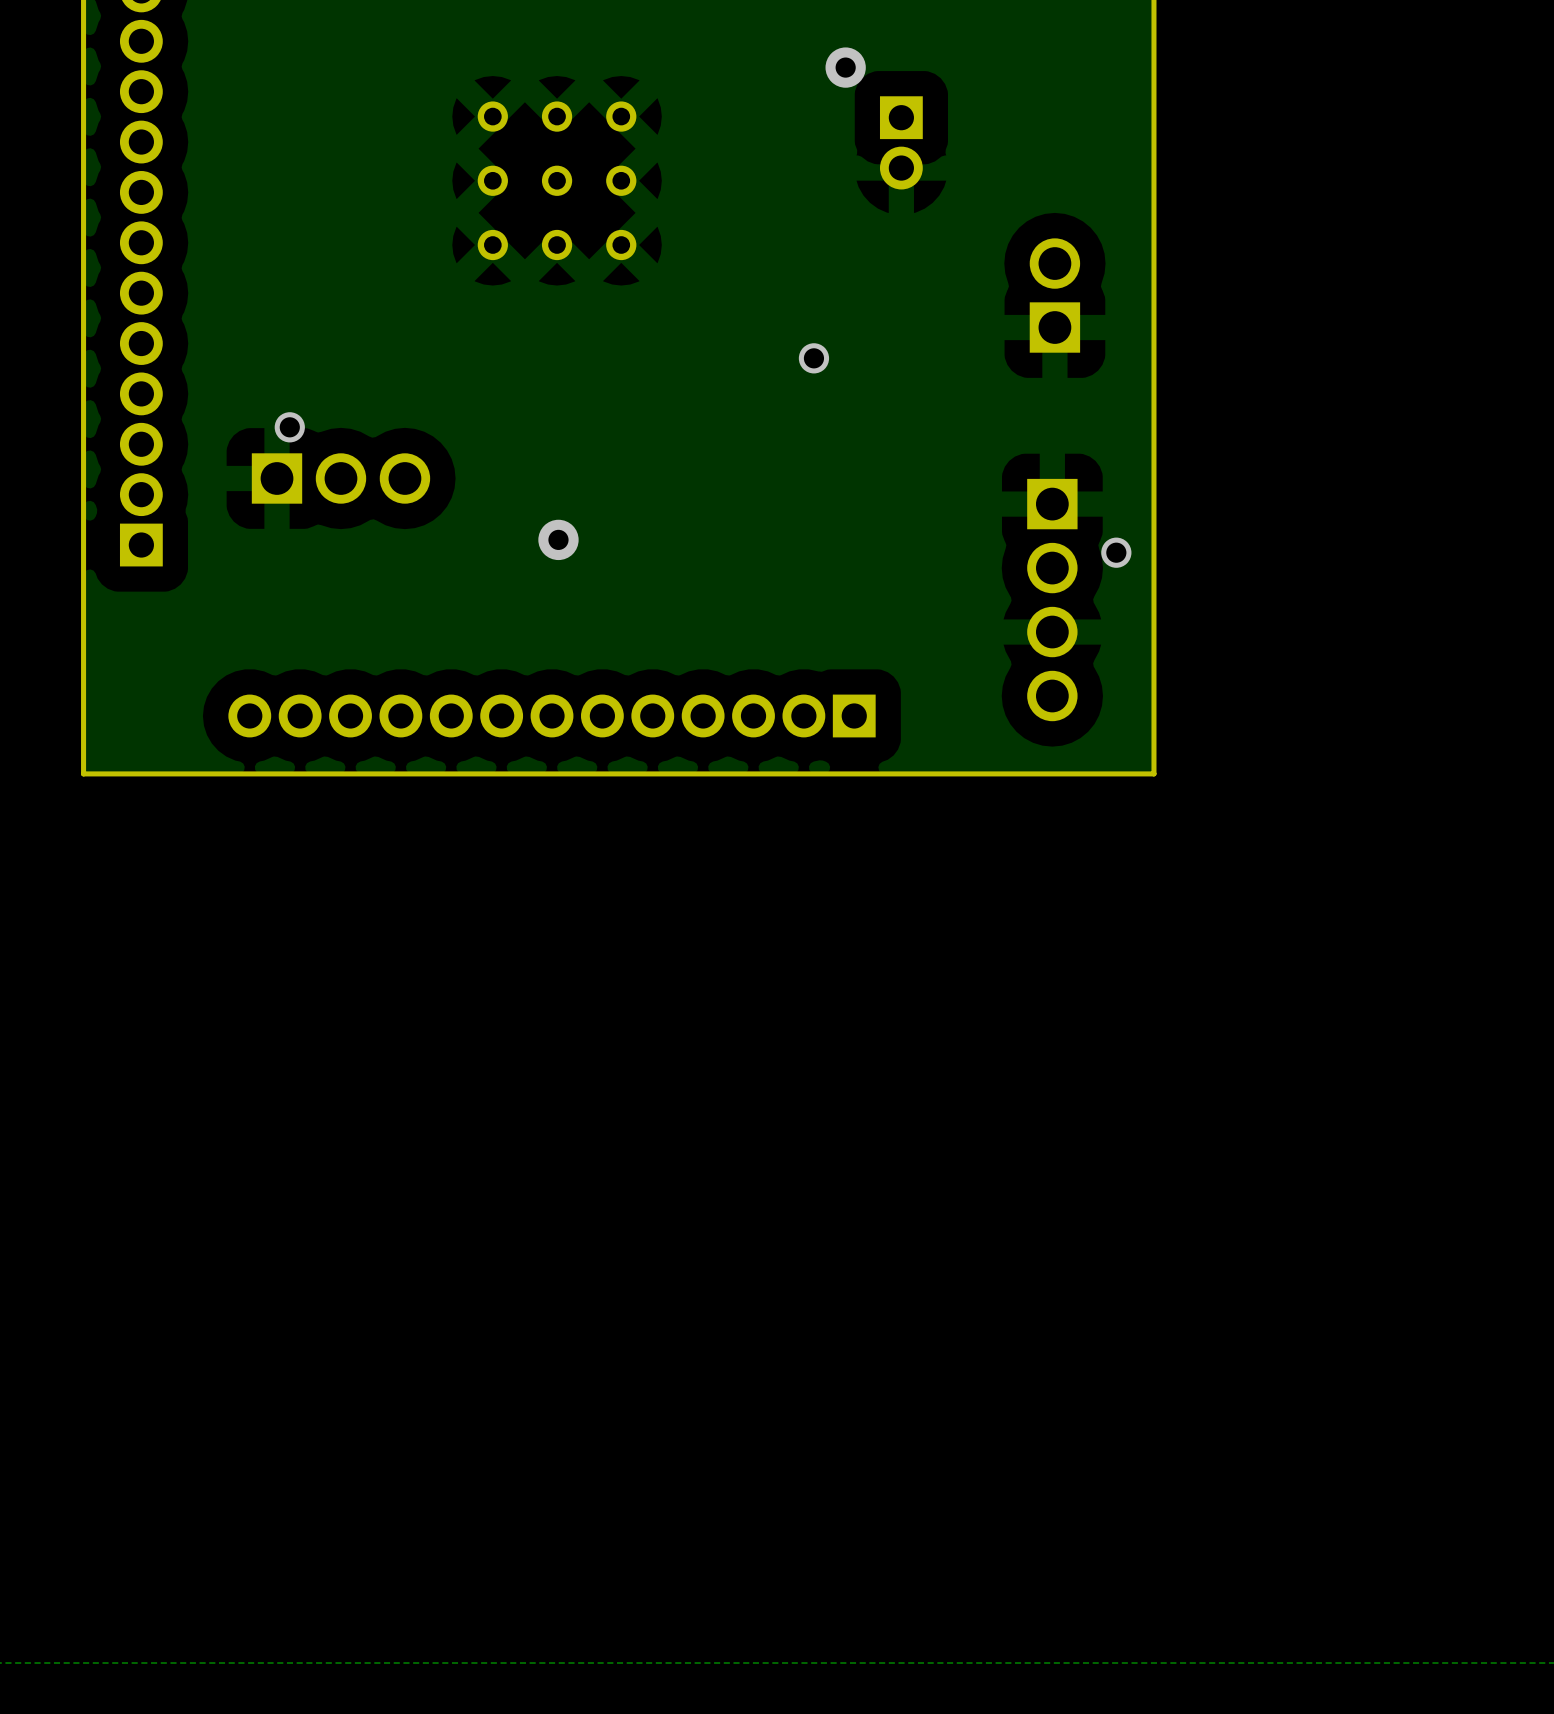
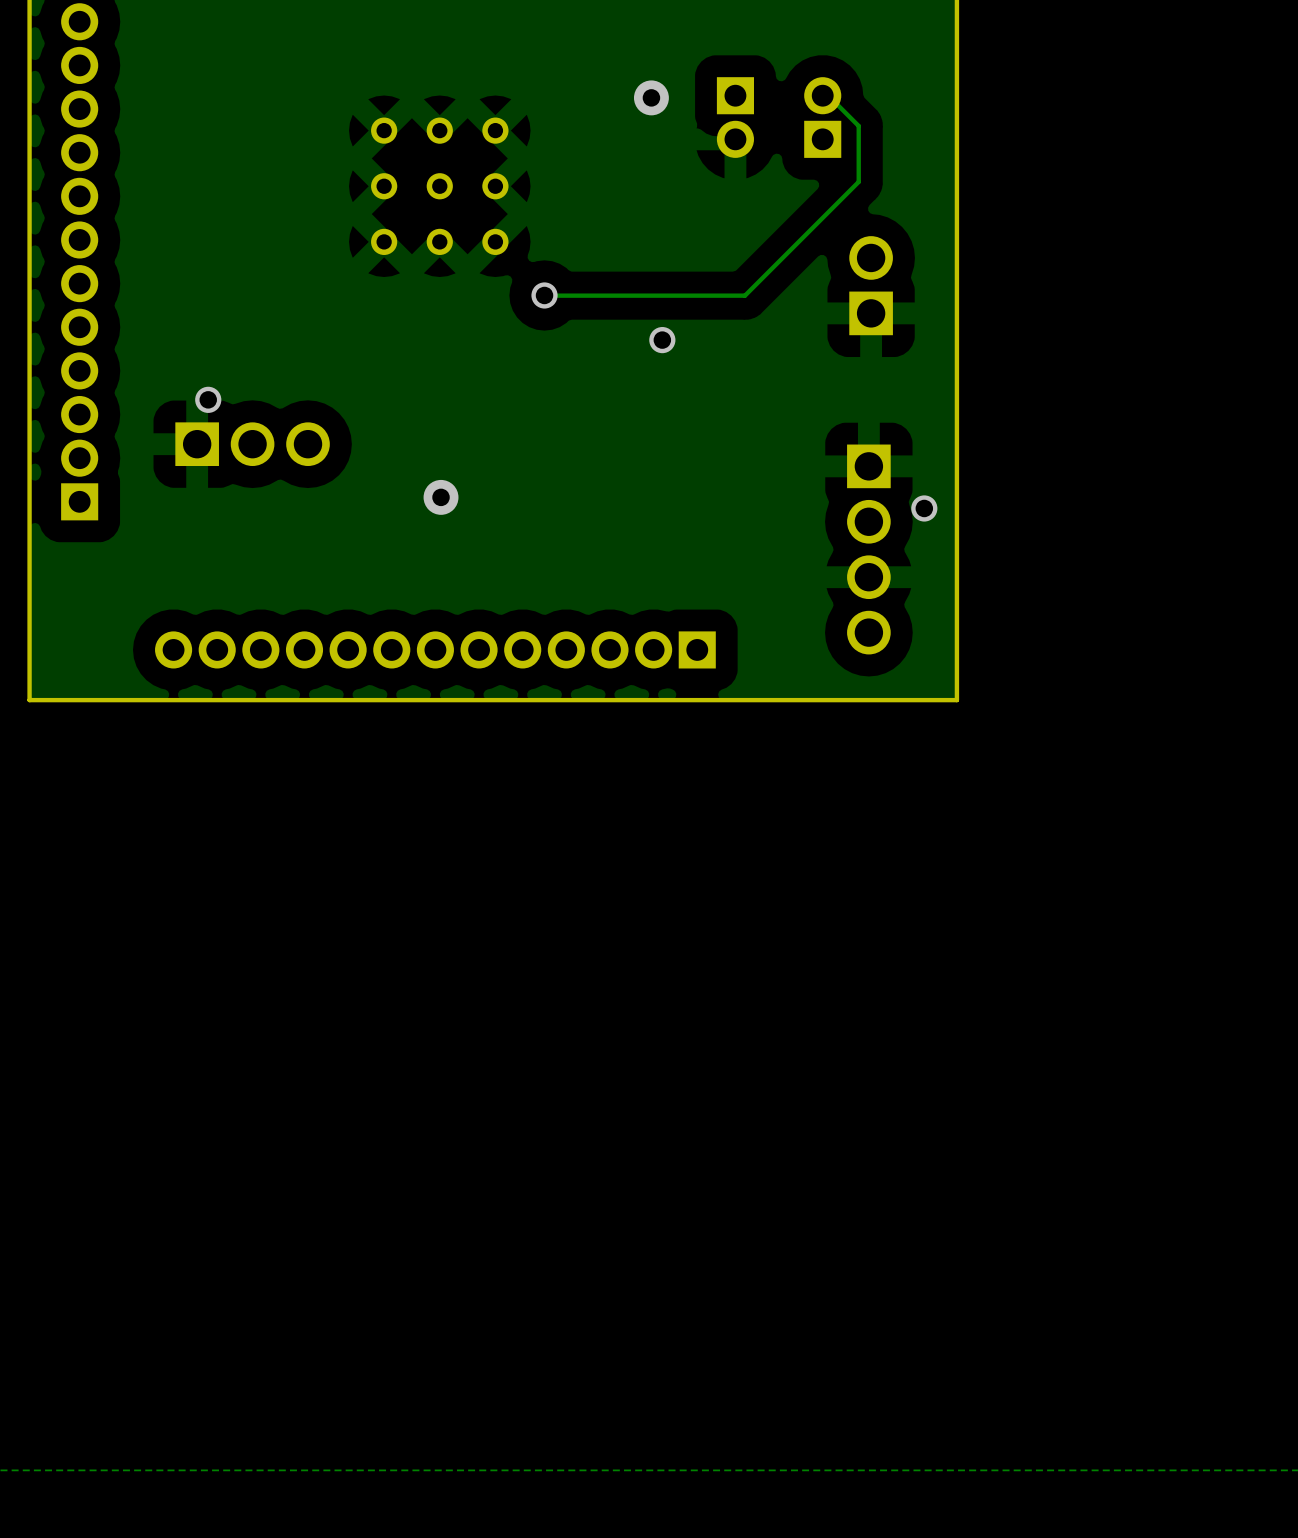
via position: (845, 67) -> (651, 97)
track: none -> (822, 95) (828, 95) (858, 126) (858, 181) (744, 295) (544, 295)
part: none -> (822, 117)
part position: (901, 142) -> (735, 117)
via: none -> (544, 295)

